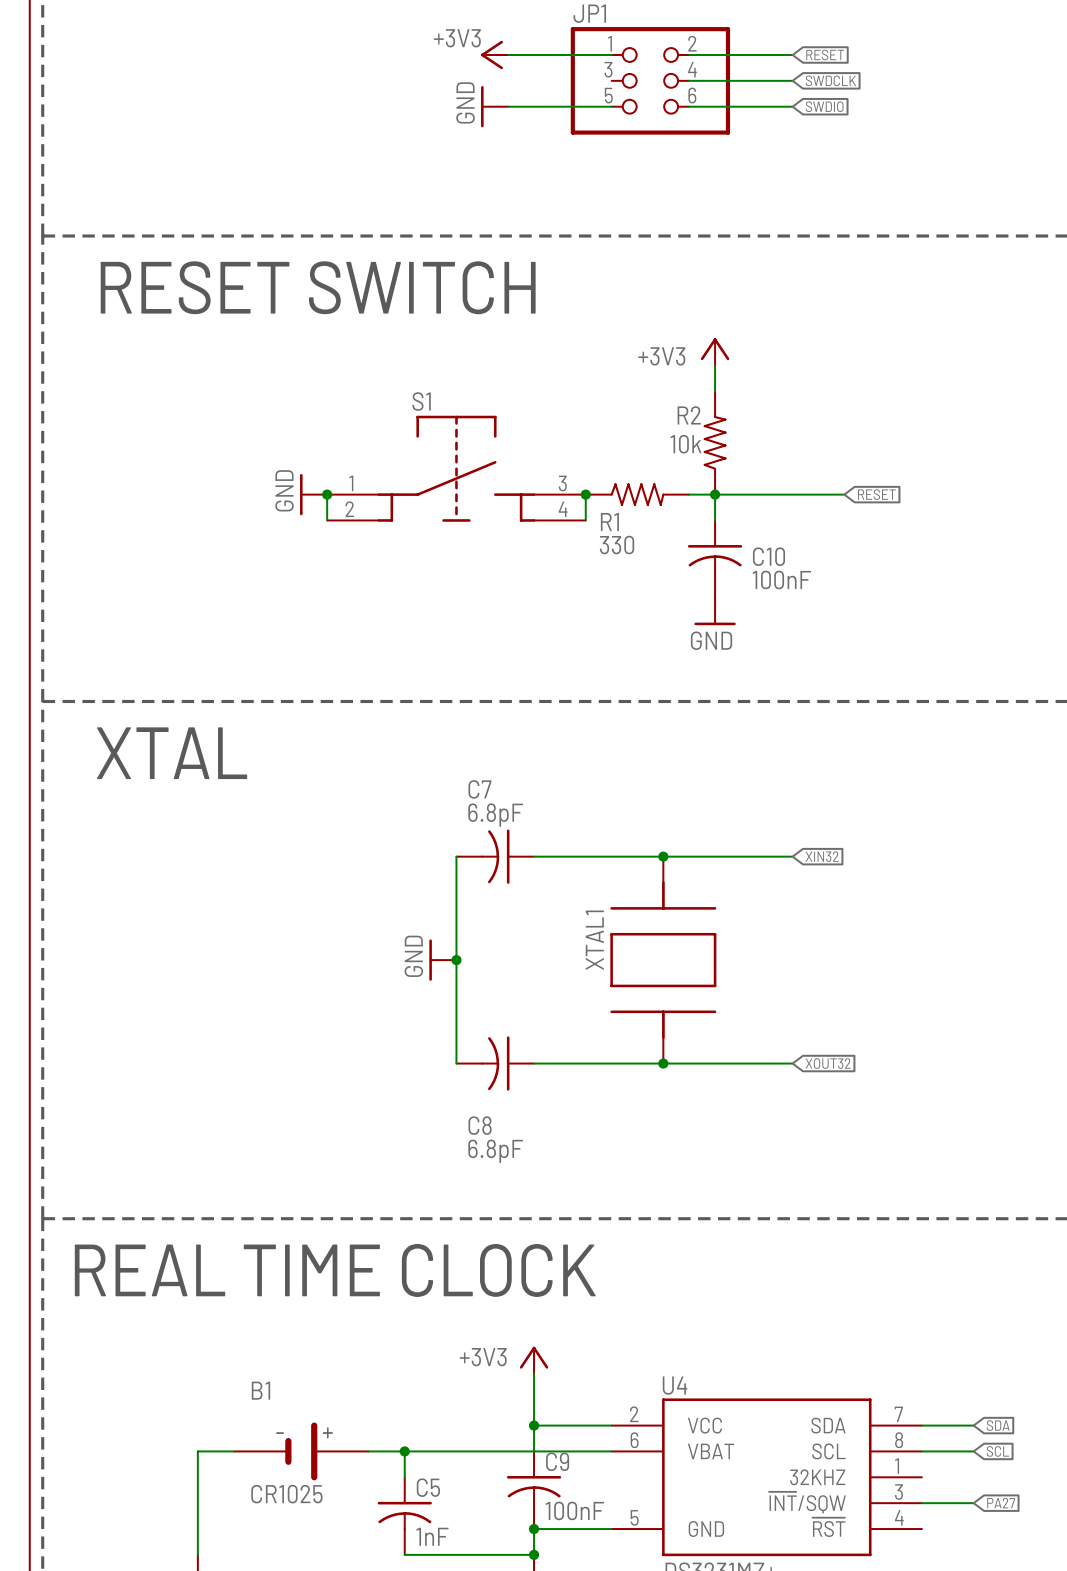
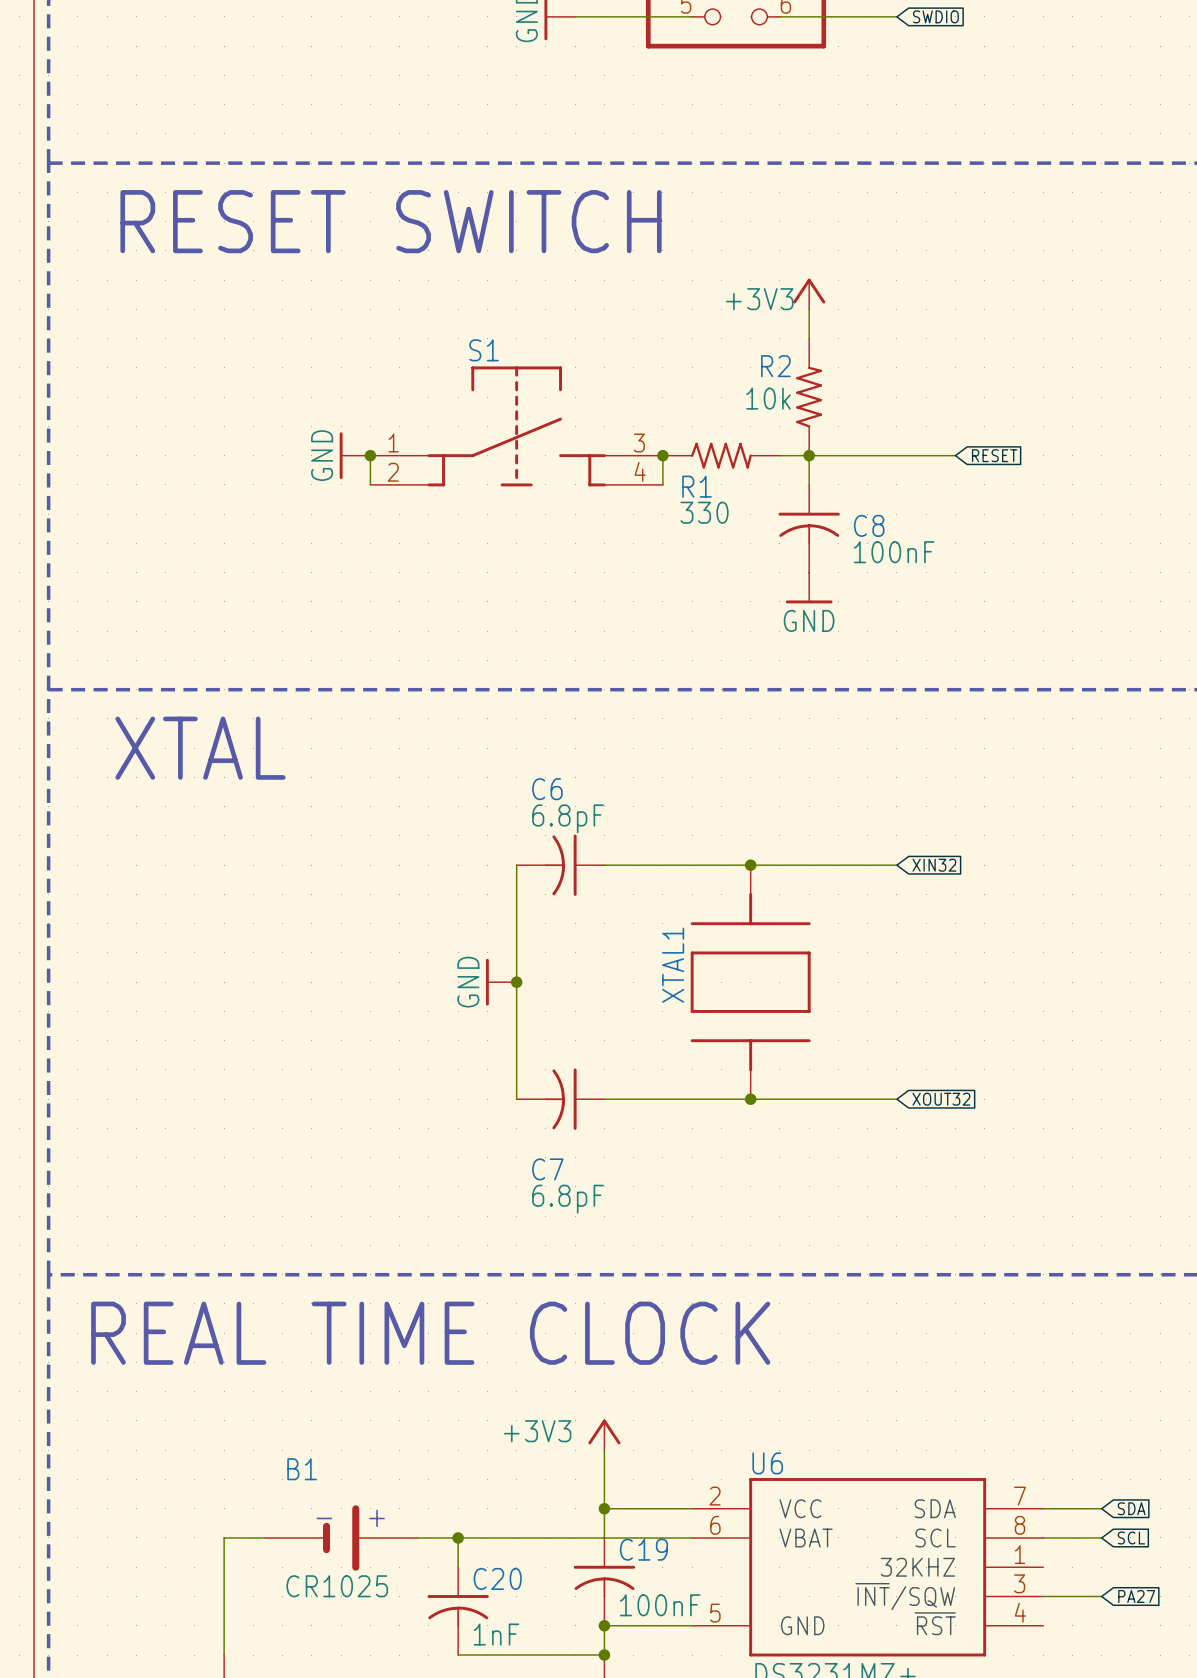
C10 name: C10 (768, 556) -> C8 (869, 525)
C7 name: C7 (479, 789) -> C6 (547, 789)
C8 name: C8 (480, 1125) -> C7 (547, 1169)
U4 name: U4 (675, 1385) -> U6 (767, 1463)
C9 name: C9 (557, 1461) -> C19 (643, 1549)
C5 name: C5 (428, 1487) -> C20 (497, 1578)

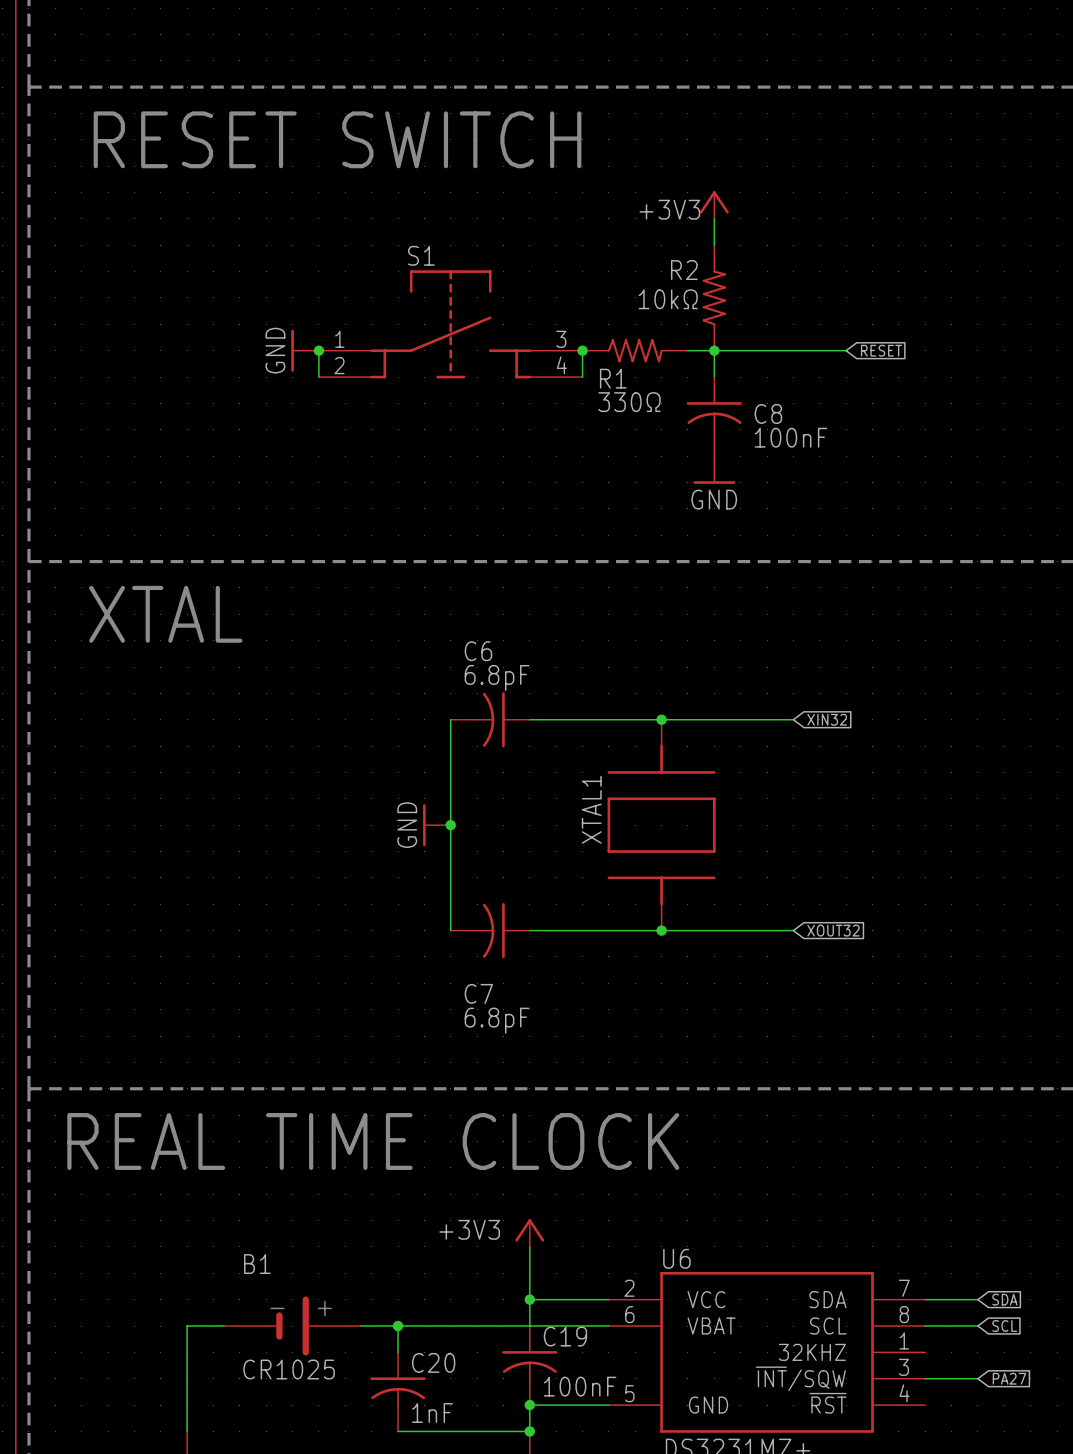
R2 value: 10k (768, 398) -> 10kΩ (668, 299)
R1 value: 330 (704, 512) -> 330Ω (629, 402)

